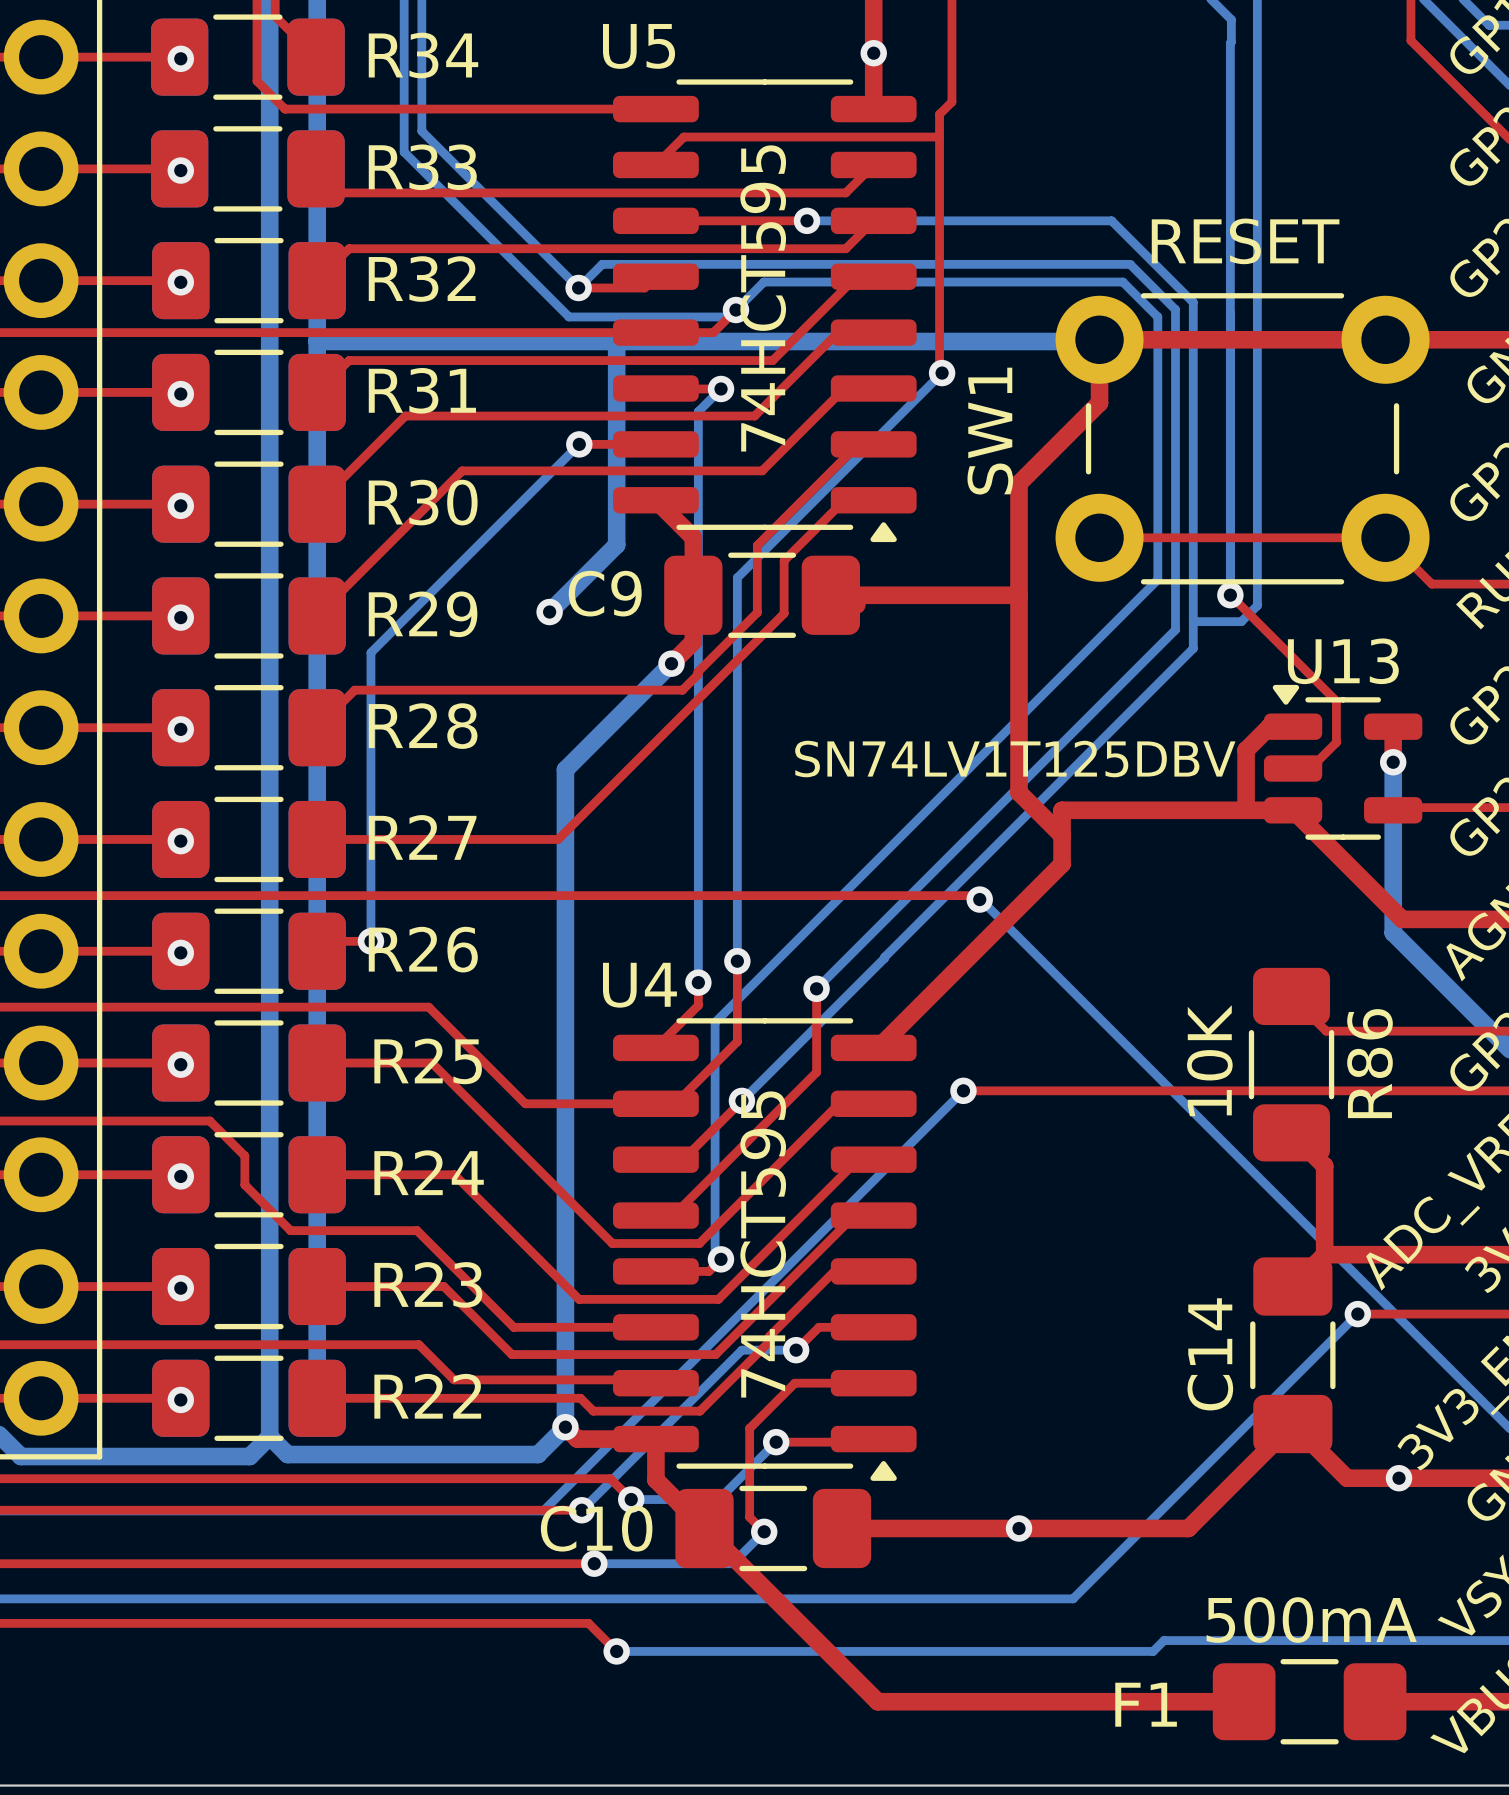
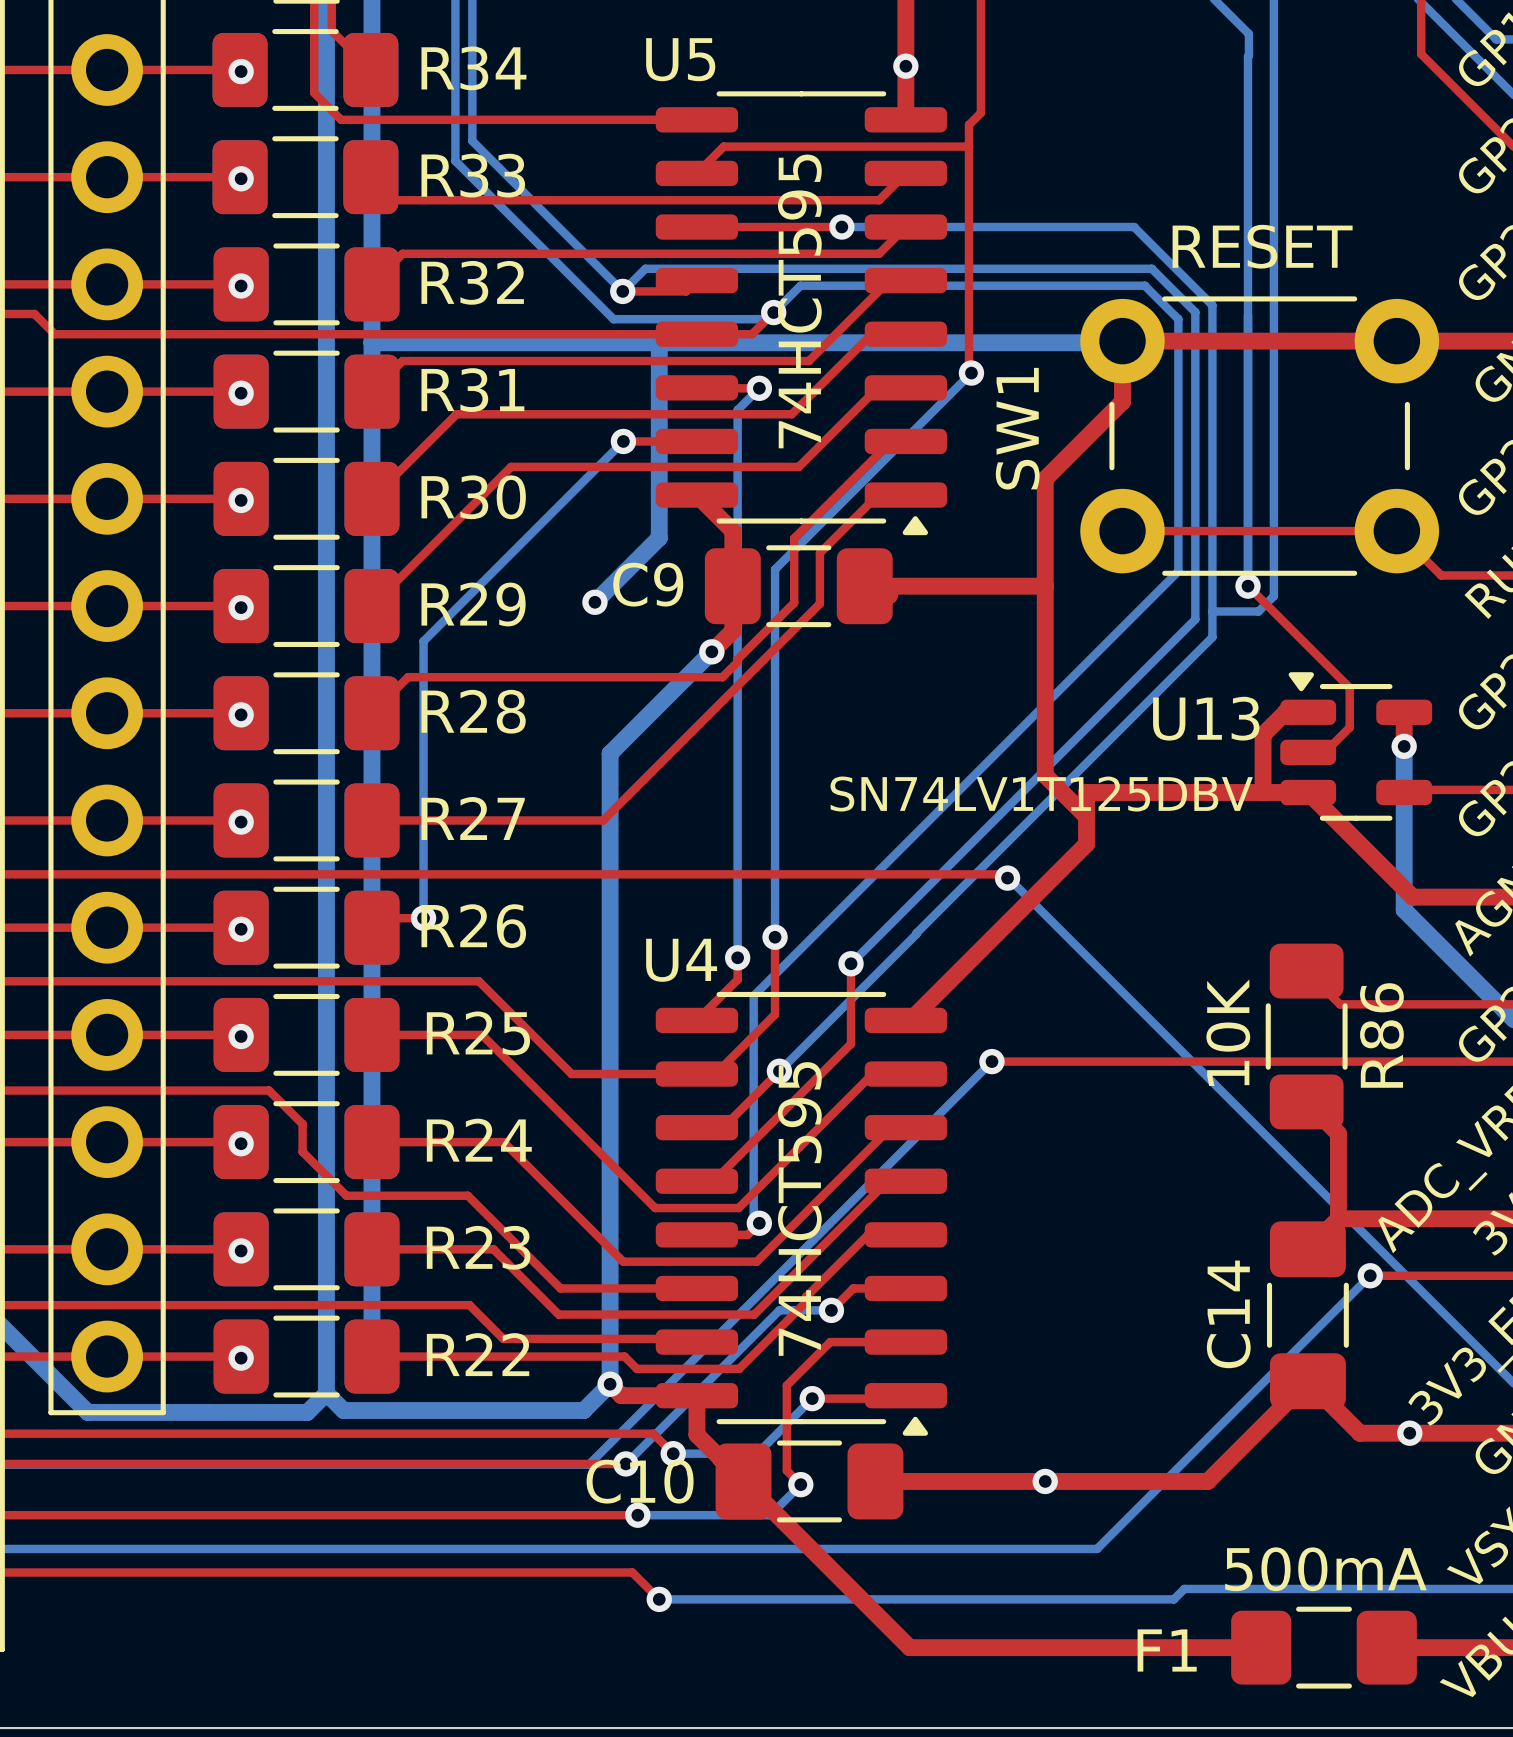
U13 name position: U13 (1343, 661) -> U13 (1206, 718)
U13 value position: SN74LV1T125DBV (1015, 759) -> SN74LV1T125DBV (1041, 794)

